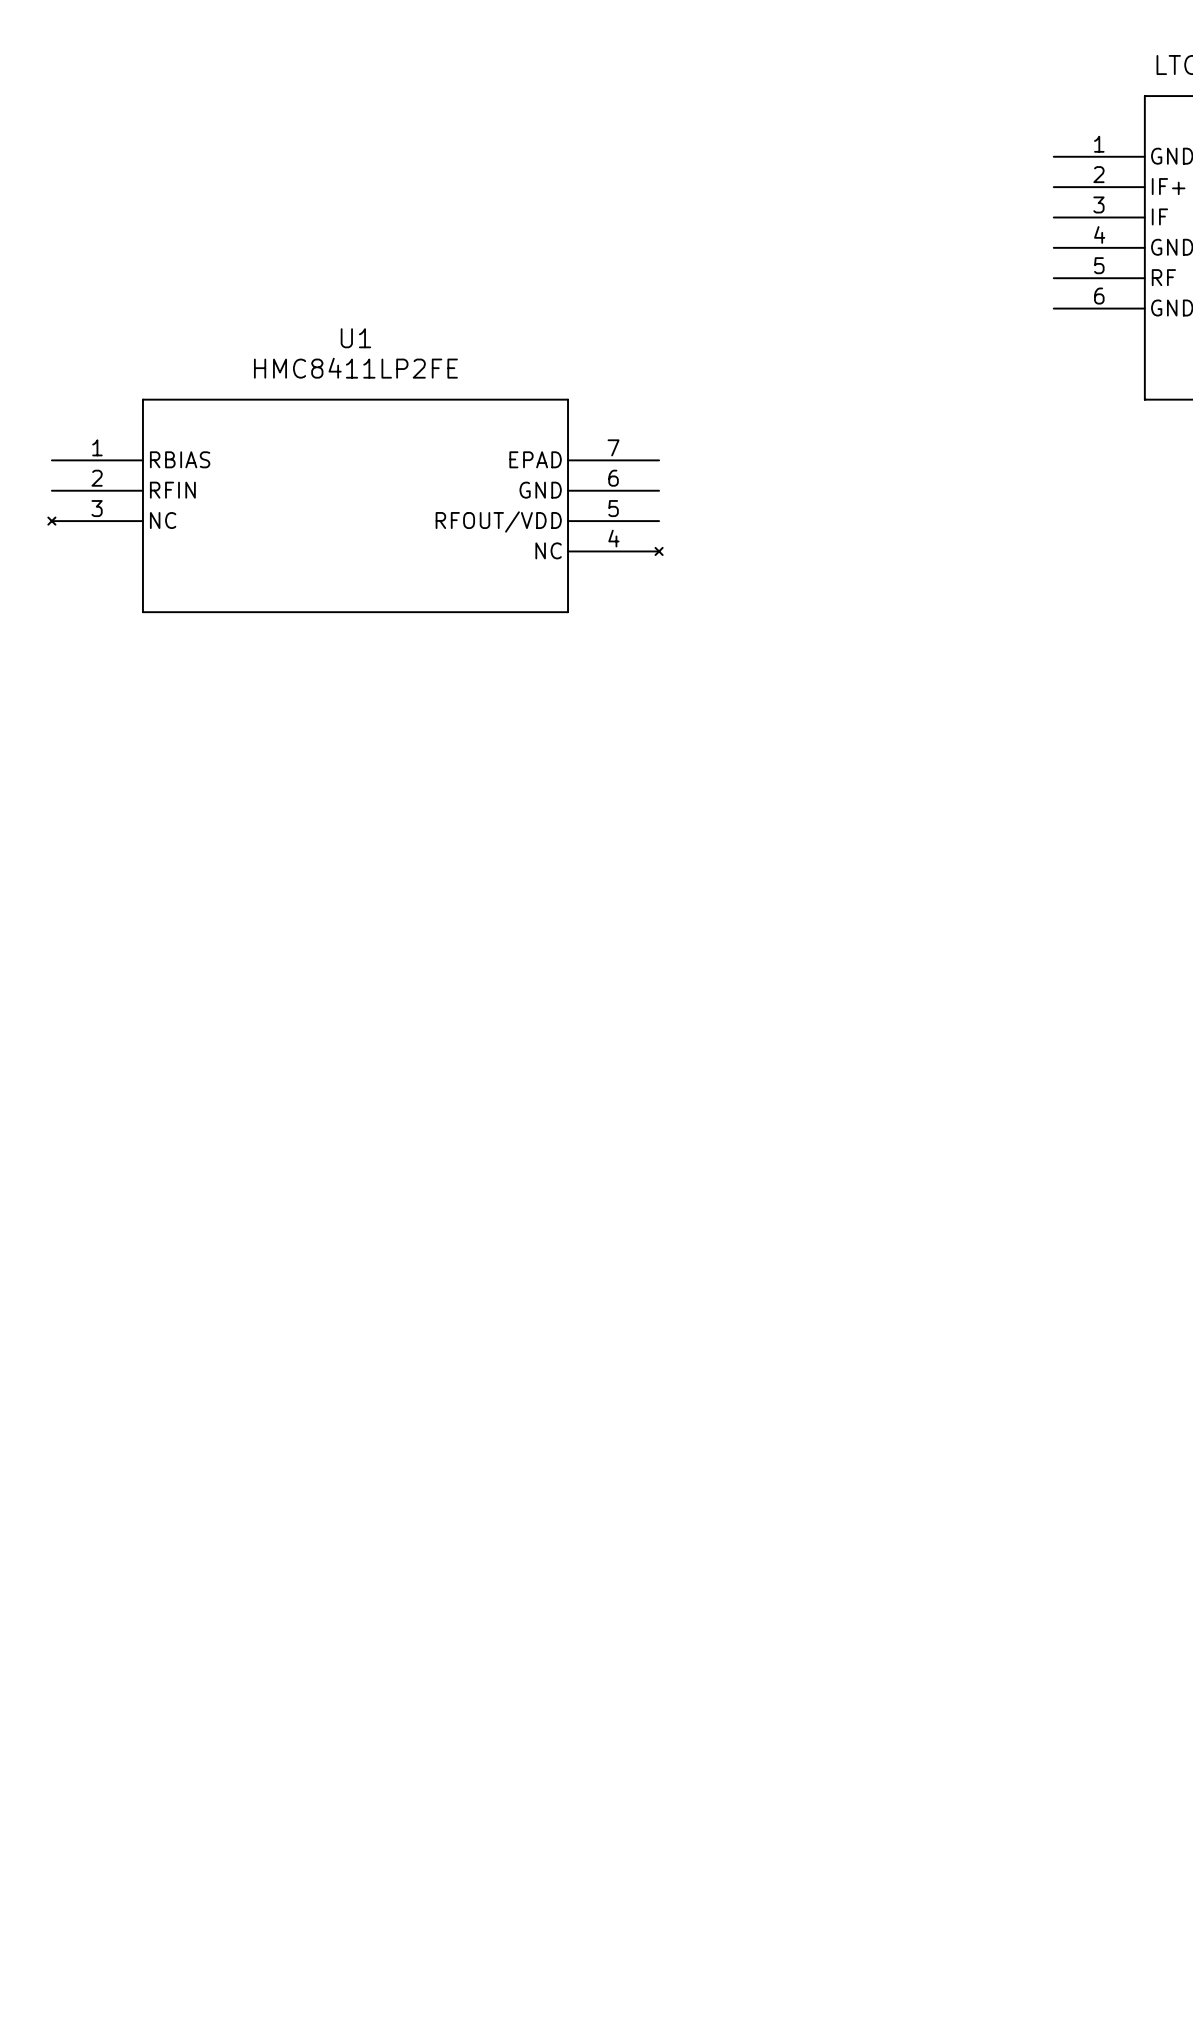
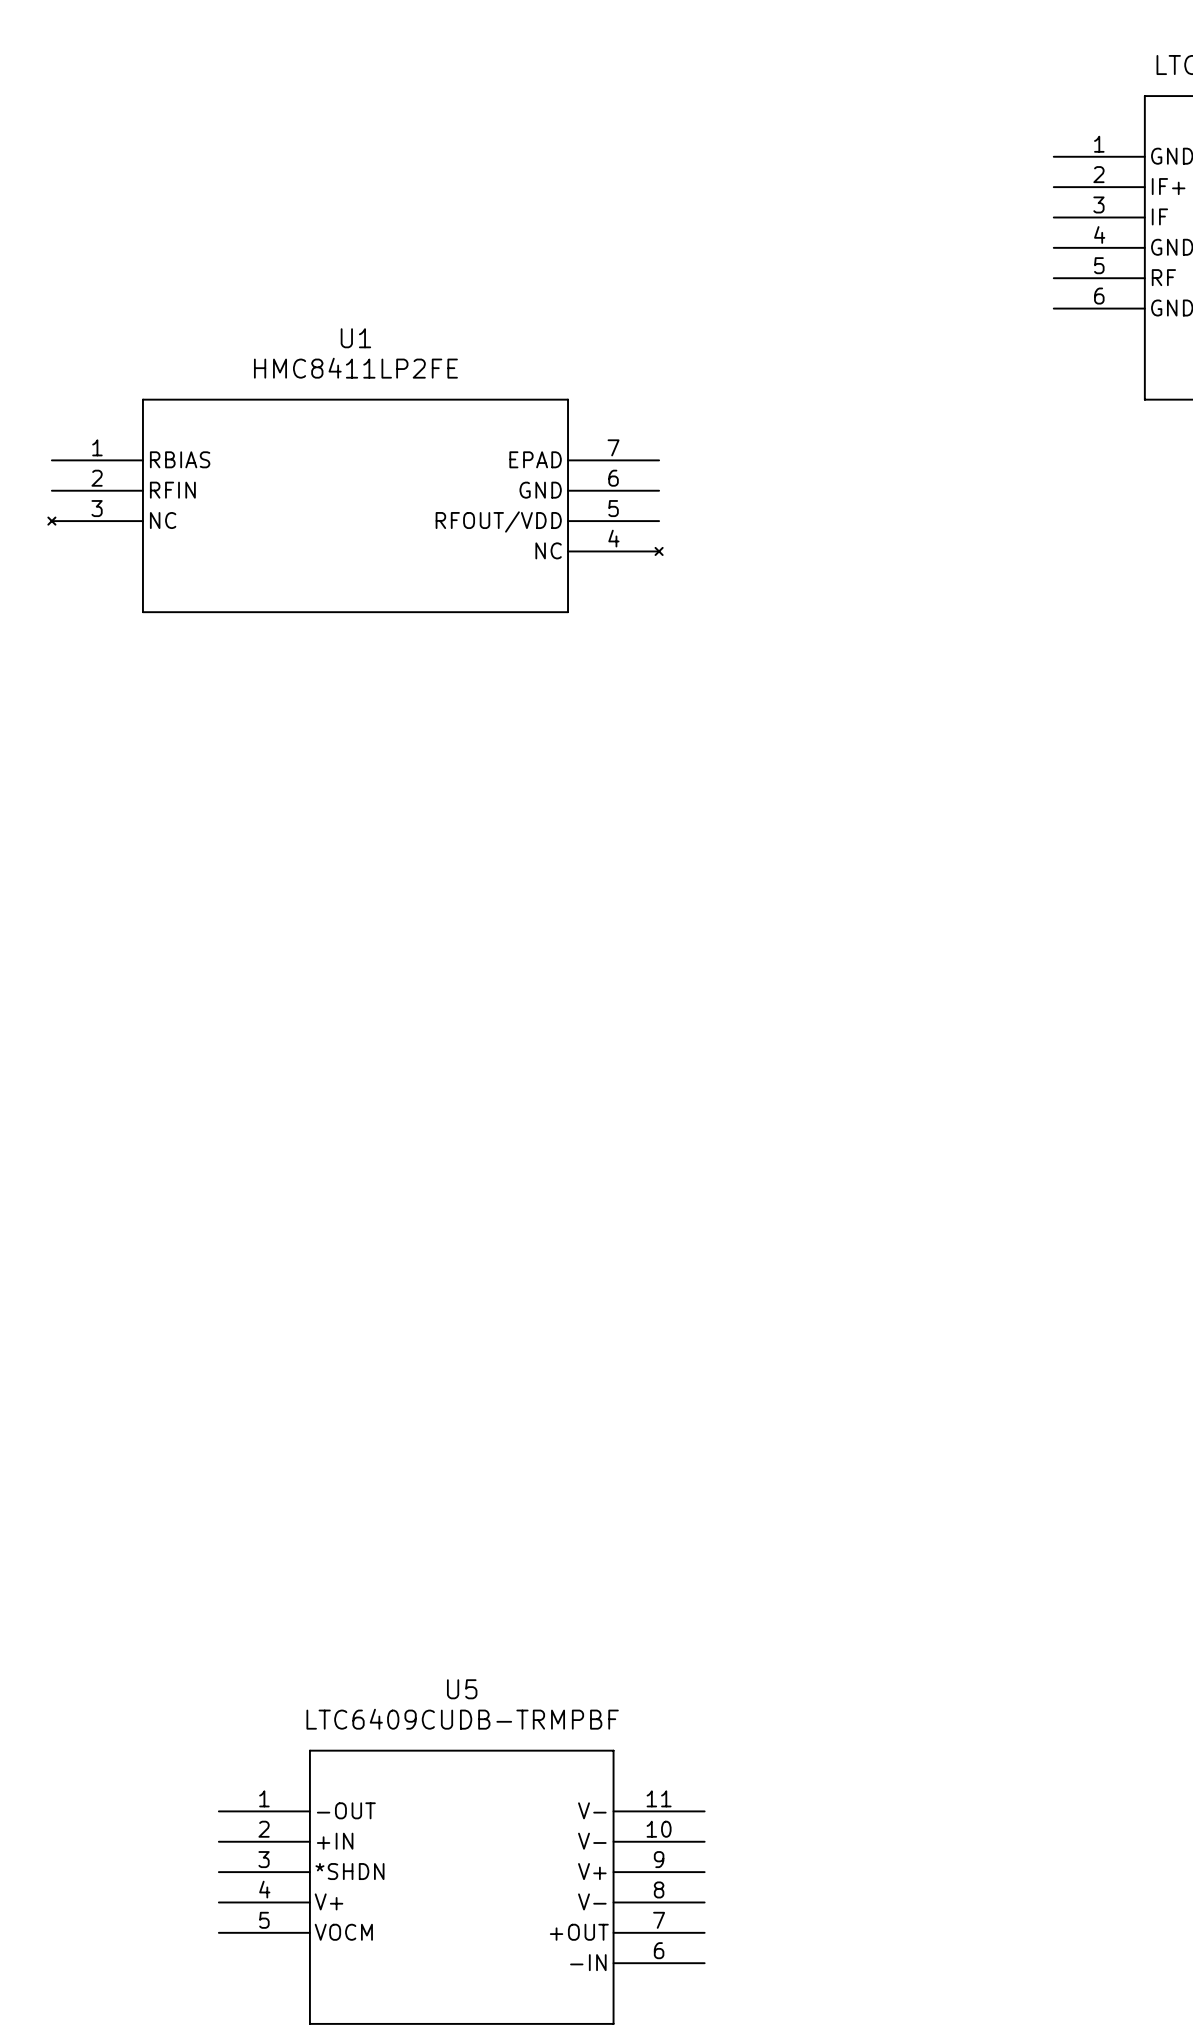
U5: none -> LTC6409CUDB-TRMPBF (461, 1887)

